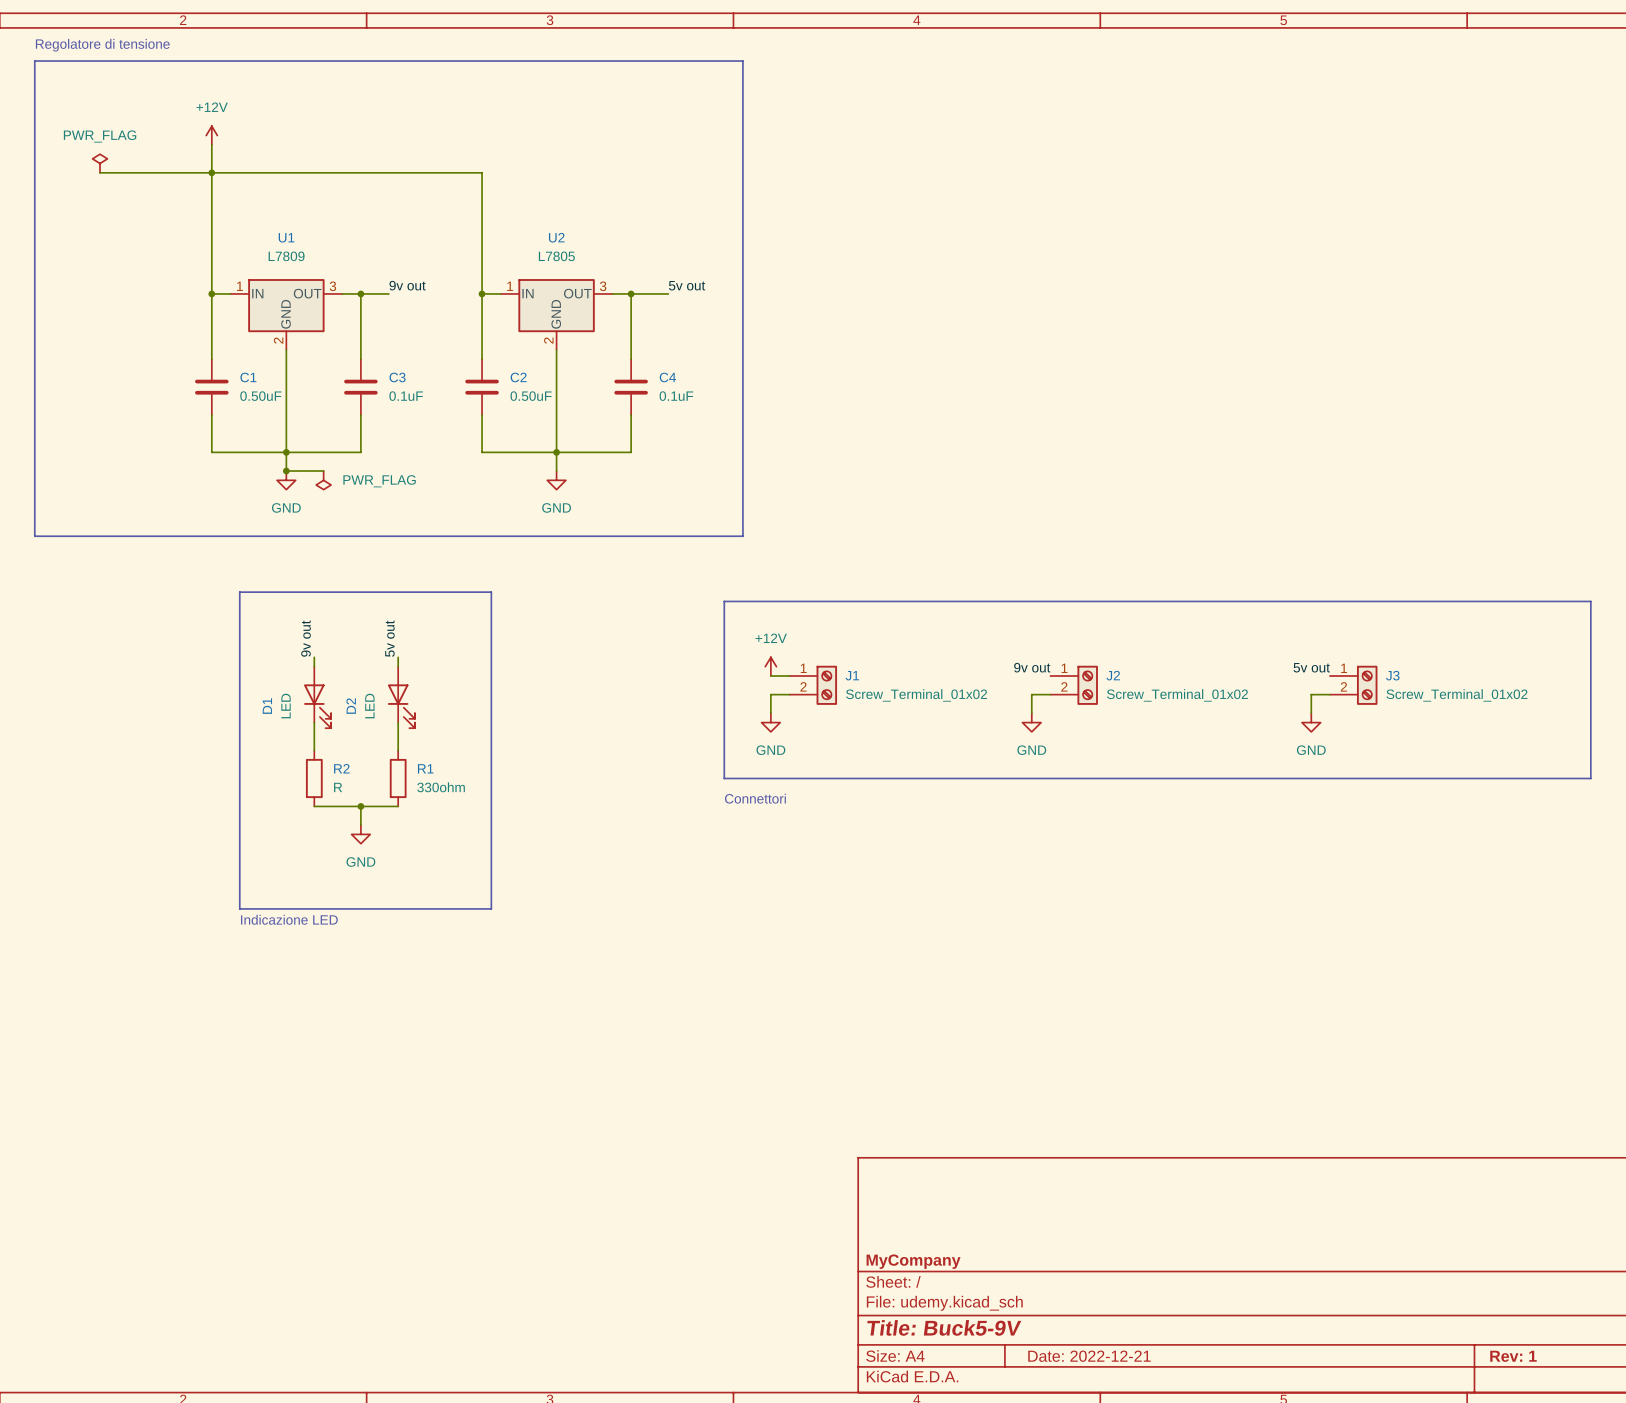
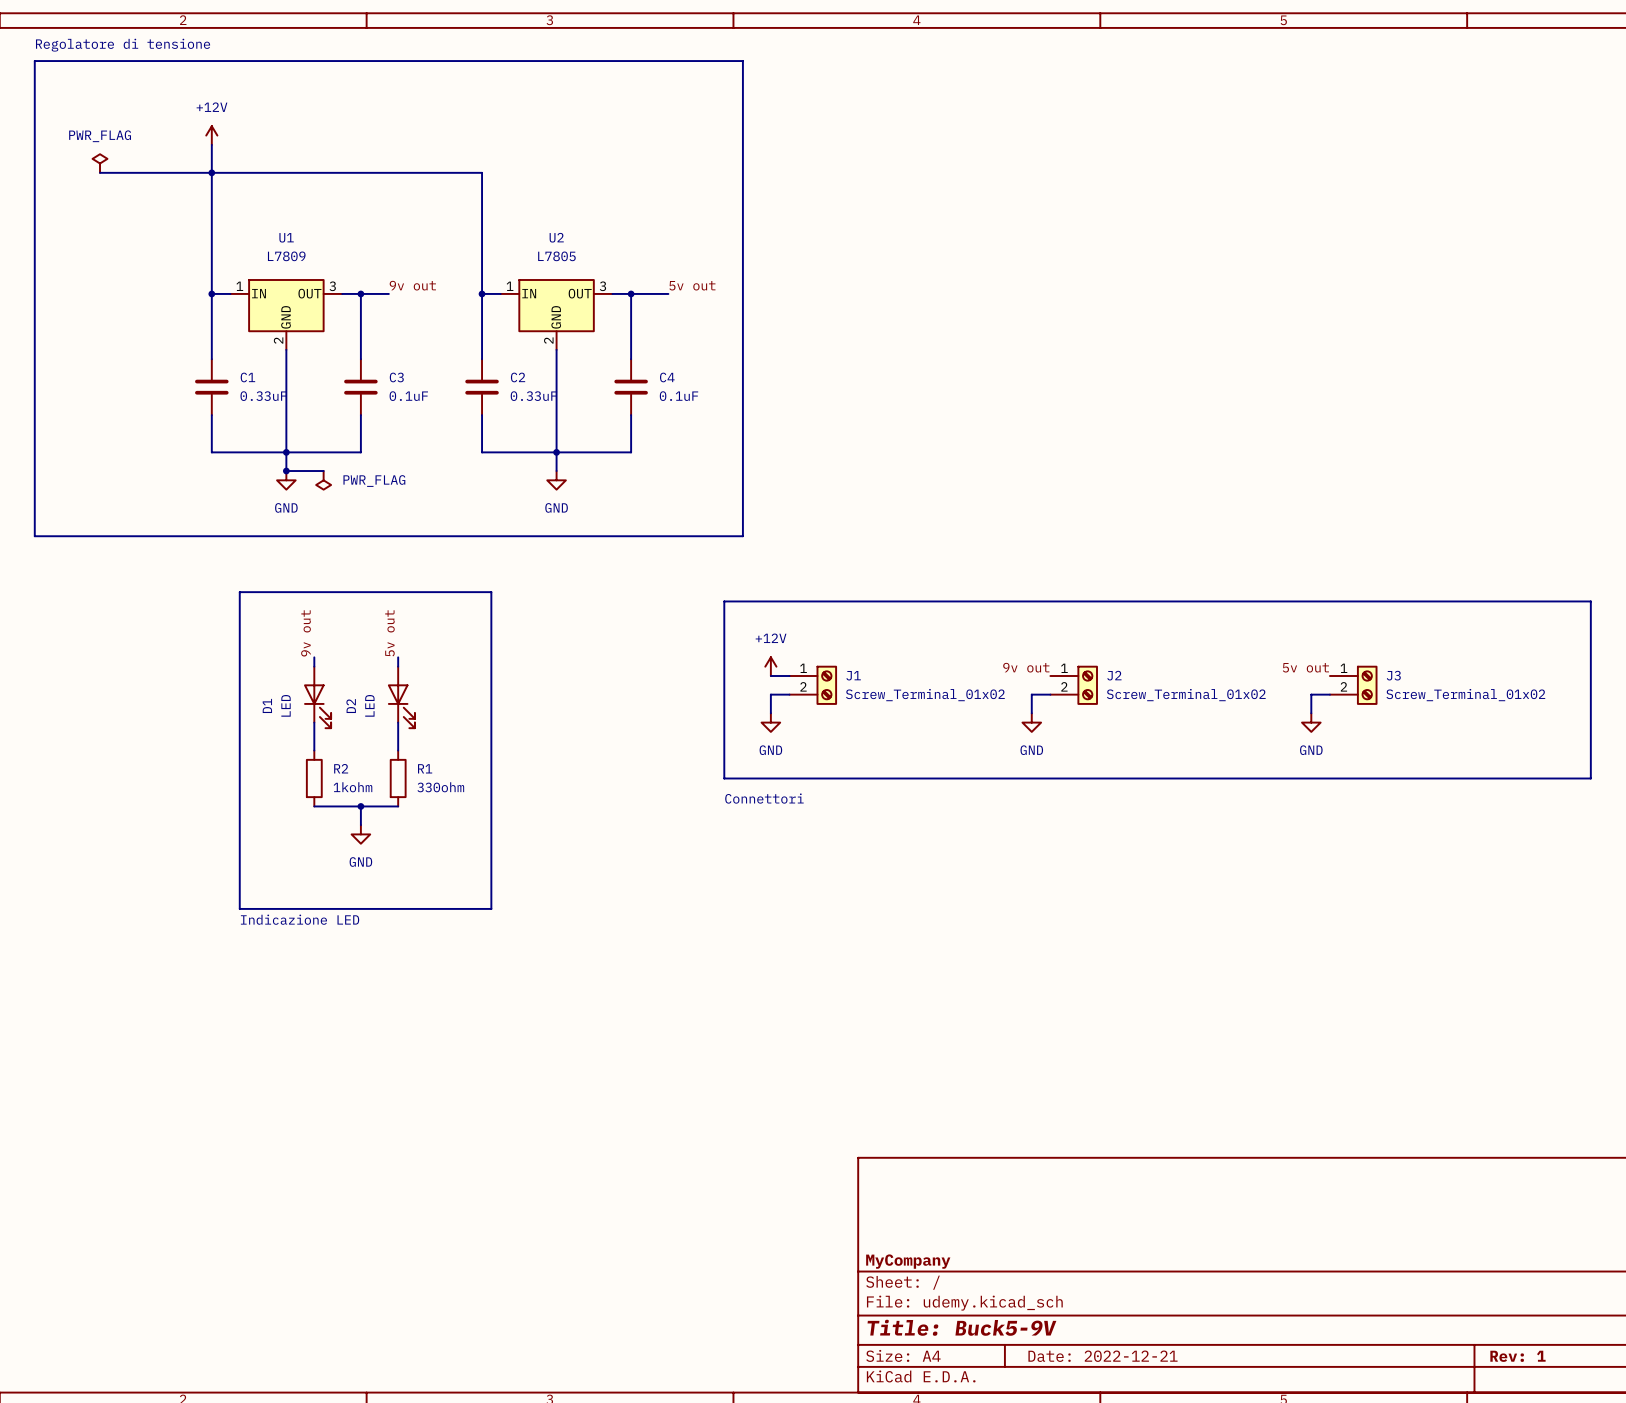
C1 value: 0.50uF (260, 396) -> 0.33uF (263, 396)
C2 value: 0.50uF (531, 396) -> 0.33uF (533, 396)
R2 value: R (338, 787) -> 1kohm (352, 787)

